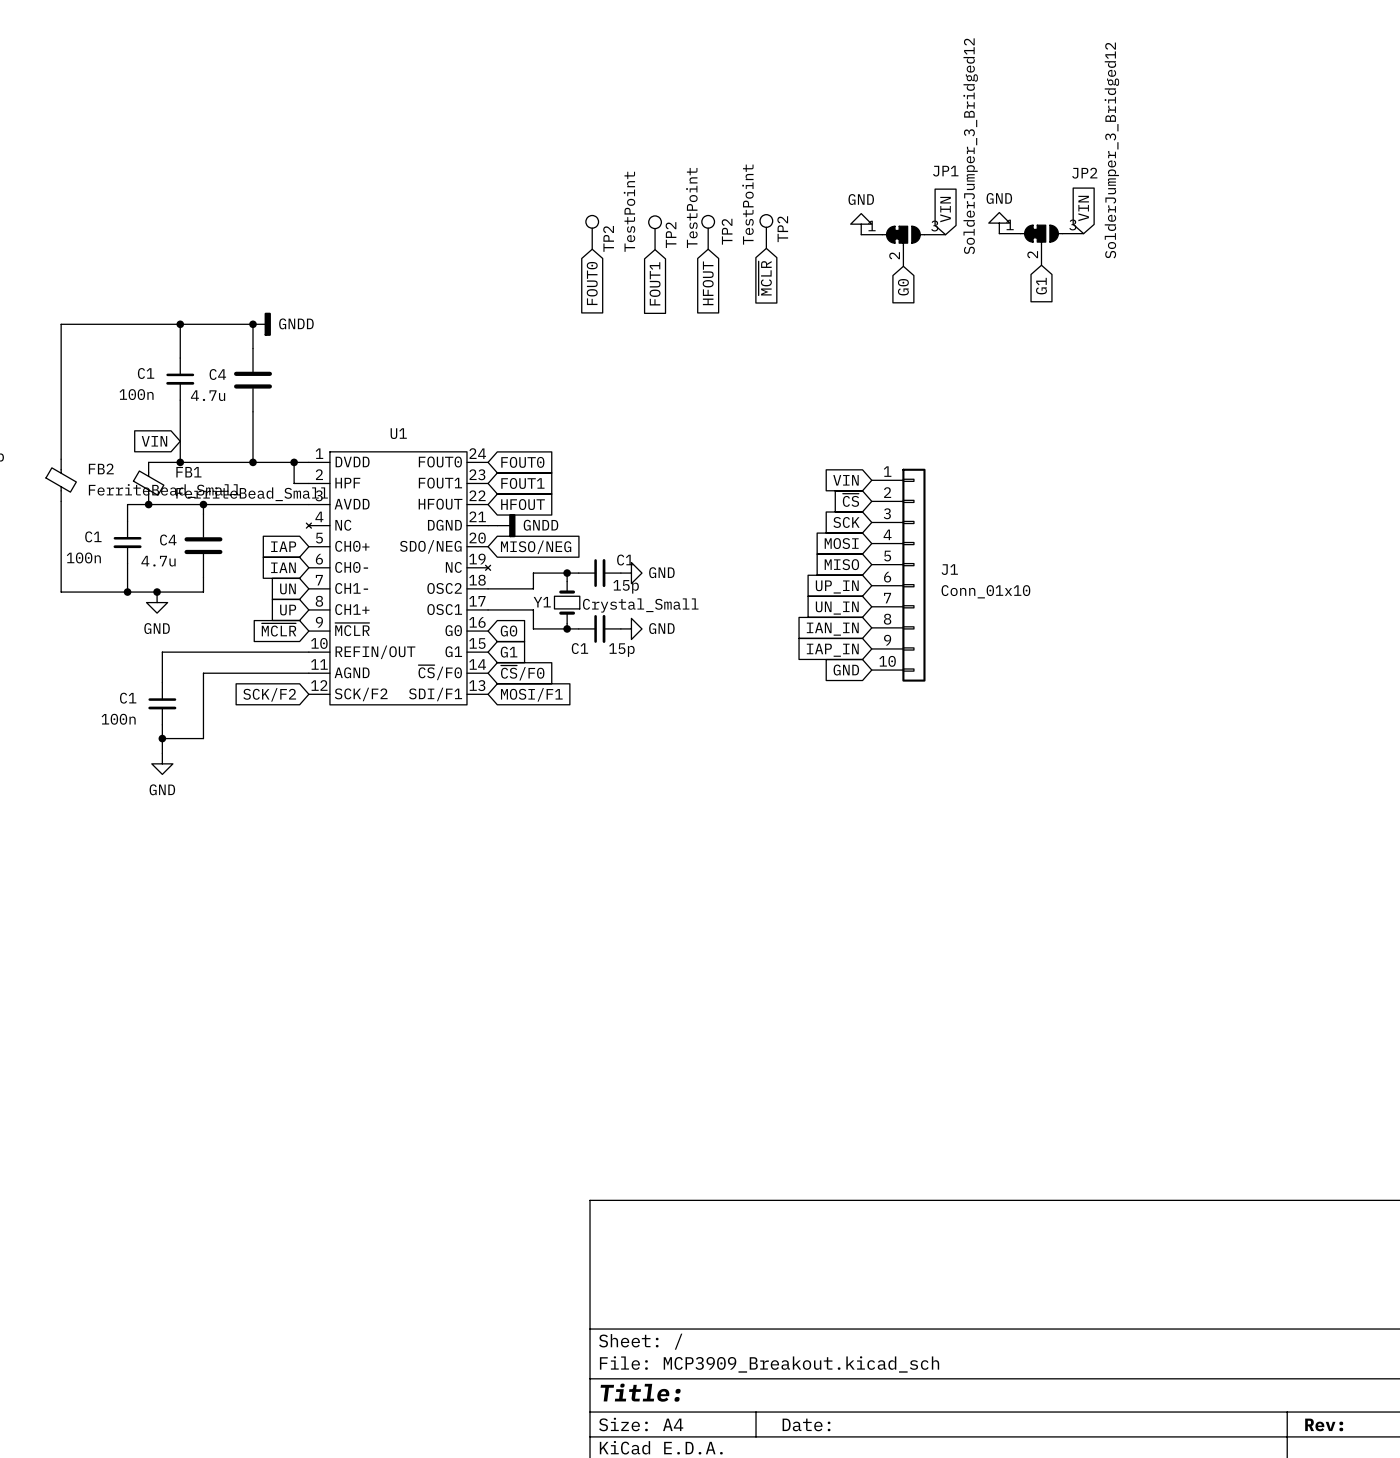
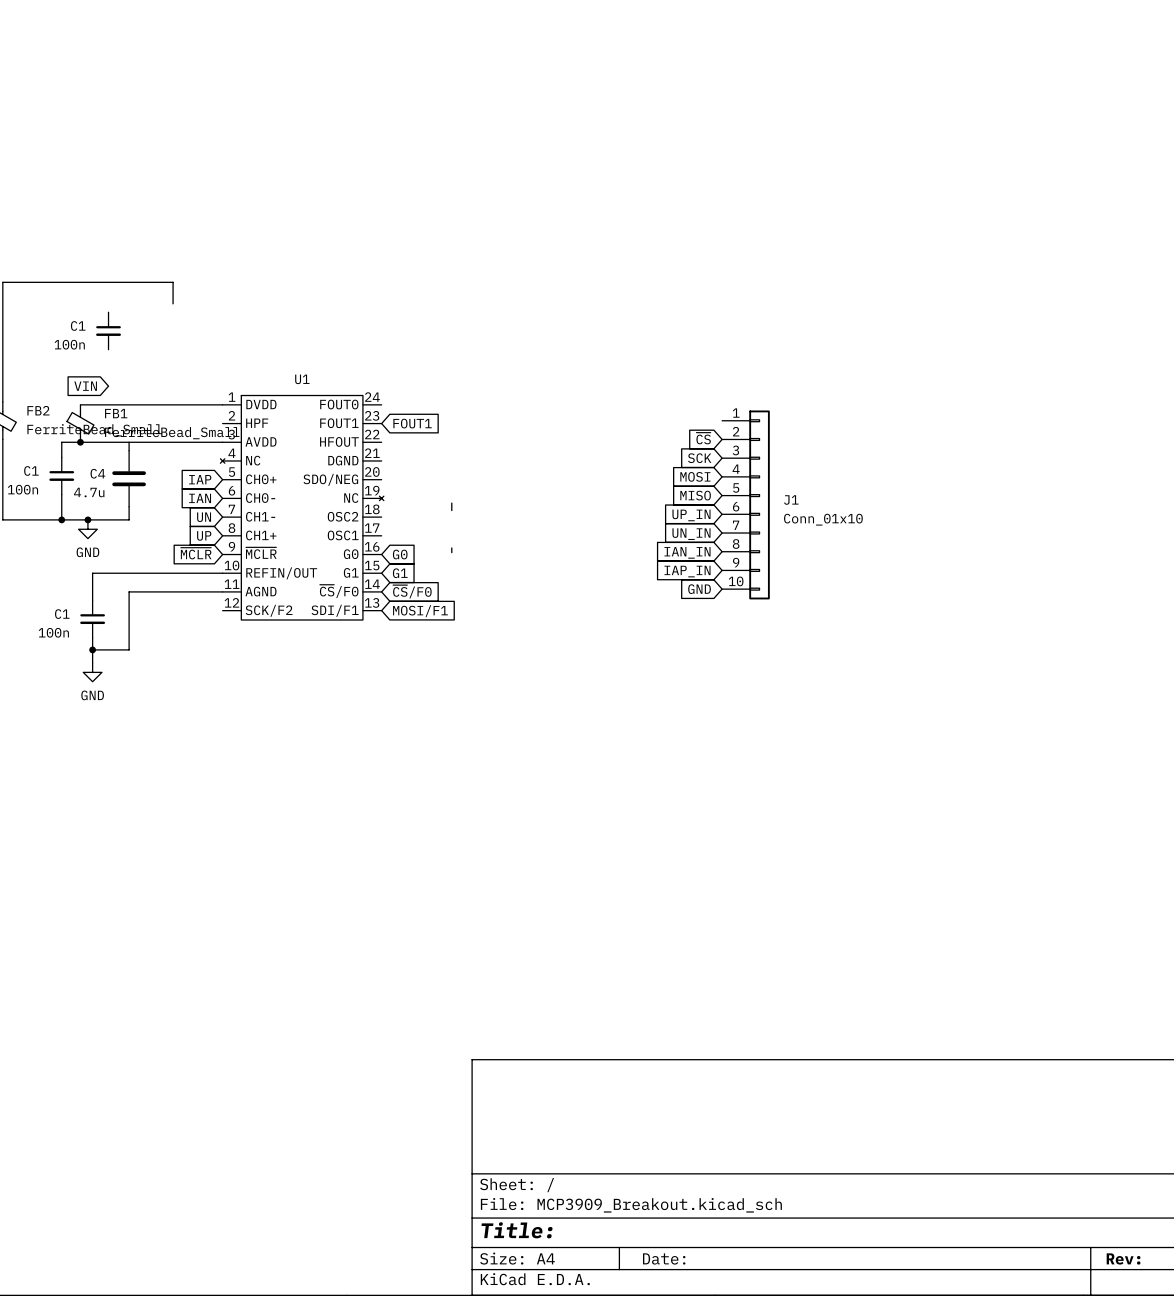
global label: VIN (1083, 208) -> none
global label: VIN (945, 209) -> none
power symbol: GND (999, 223) -> none
power symbol: GND (861, 224) -> none
TP2: (766, 231) -> none
TP2: TestPoint (592, 232) -> none
TP2: TestPoint (655, 232) -> none
TP2: TestPoint (708, 232) -> none
JP2: SolderJumper_3_Bridged12 (1041, 245) -> none
JP1: SolderJumper_3_Bridged12 (903, 246) -> none
global label: ~{MCLR} (765, 278) -> none
global label: FOUT0 (592, 283) -> none
global label: FOUT1 (655, 283) -> none
global label: HFOUT (708, 283) -> none
global label: G1 (1041, 286) -> none
global label: G0 (903, 287) -> none
wire: (180, 324) (180, 358) -> none
junction: (180, 324) -> none
junction: (253, 324) -> none
power symbol: GNDD (261, 324) -> none
C4: 4.7u (253, 380) -> none
wire: (180, 400) (180, 462) -> none
wire: (253, 411) (253, 462) -> none
junction: (180, 462) -> none
junction: (253, 462) -> none
wire: (294, 462) (294, 483) (308, 483) -> none
junction: (294, 462) -> none
global label: FOUT0 (522, 462) -> none
global label: VIN (845, 480) -> none
junction: (203, 504) -> none
global label: HFOUT (523, 504) -> none
wire: (488, 525) (497, 525) -> none
power symbol: GNDD (506, 525) -> none
global label: MISO/NEG (536, 547) -> none
junction: (567, 573) -> none
wire: (578, 573) (533, 573) (533, 588) (488, 588) -> none
C1: 15p (599, 573) -> none
power symbol: GND (631, 573) -> none
Y1: Crystal_Small (567, 602) -> none
wire: (488, 609) (533, 609) (533, 628) (578, 628) -> none
junction: (567, 628) -> none
C1: 15p (599, 628) -> none
power symbol: GND (631, 628) -> none
global label: SCK/F2 (269, 694) -> none

